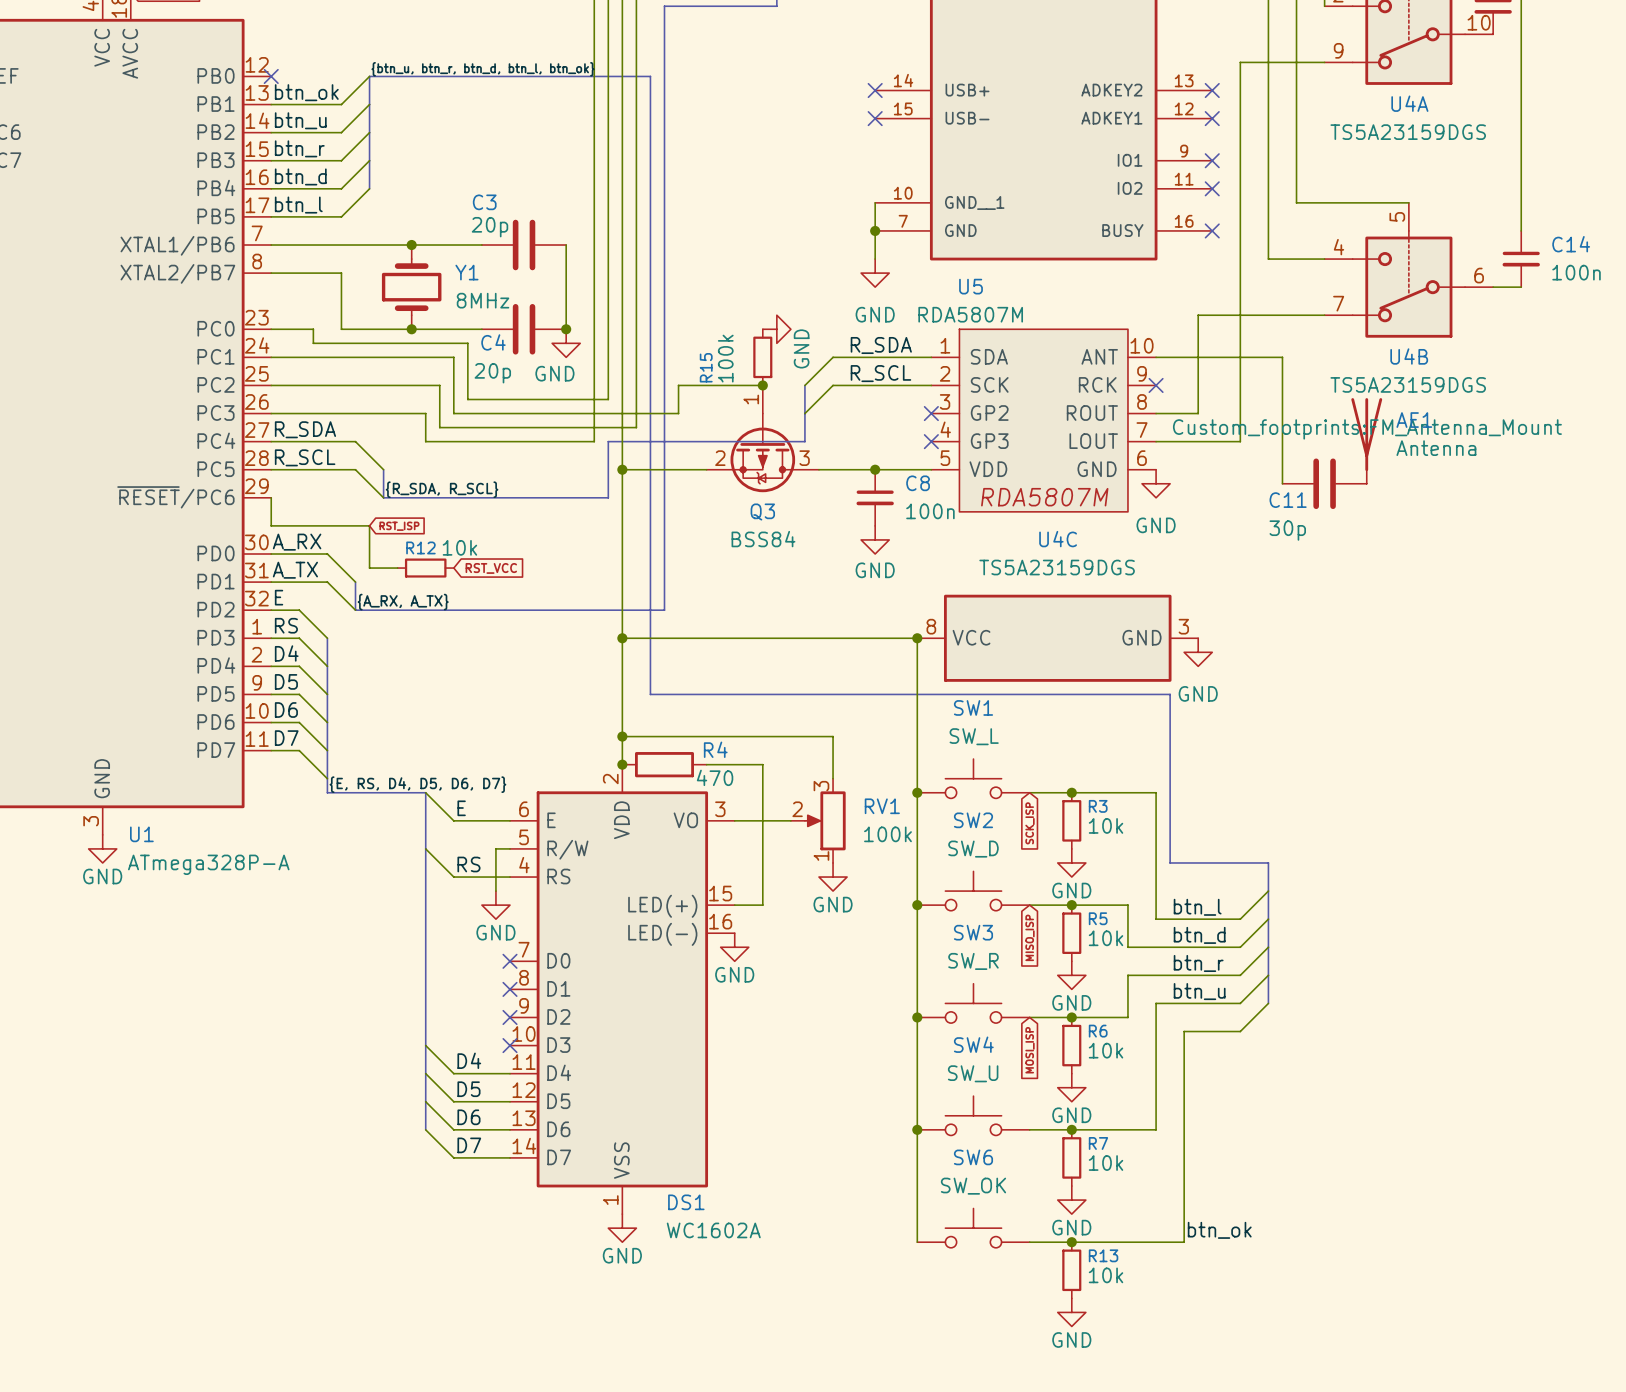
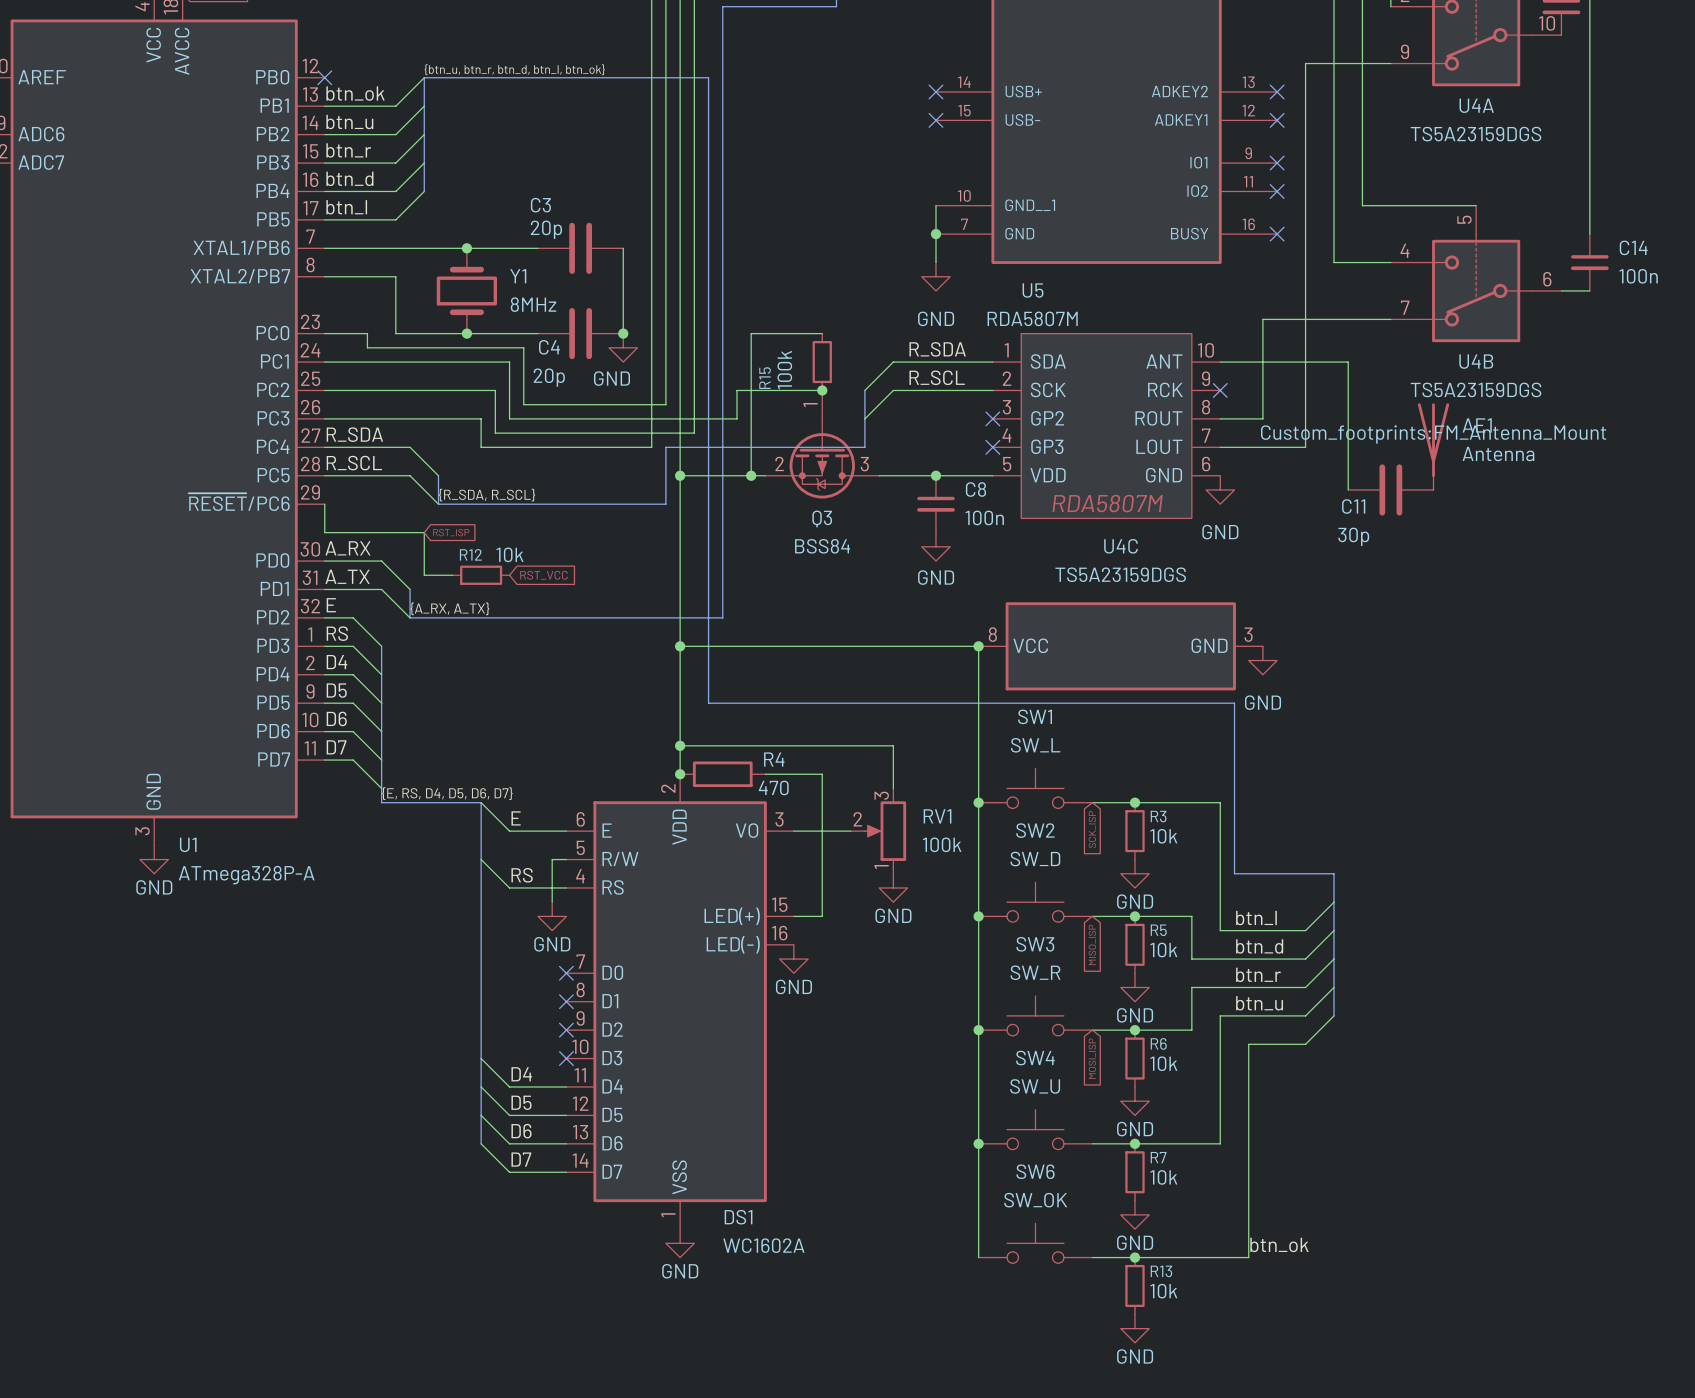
wire: none -> (822, 333) (751, 333) (751, 475)
power symbol: GND (776, 329) -> none
junction: none -> (751, 475)

